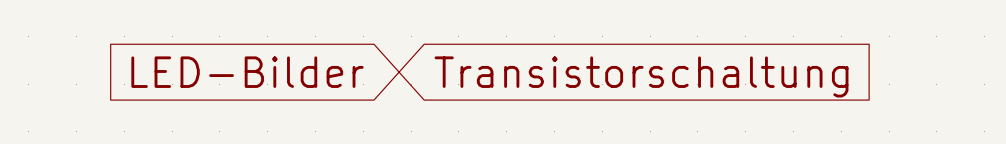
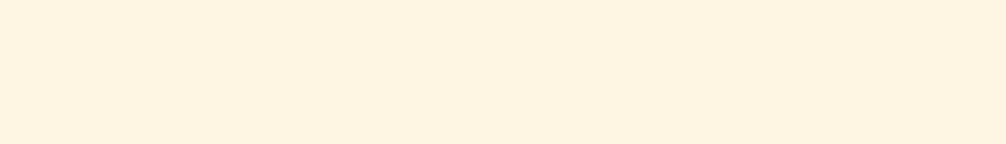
global label: LED-Bilder (247, 72) -> none
global label: Transistorschaltung (641, 76) -> none

